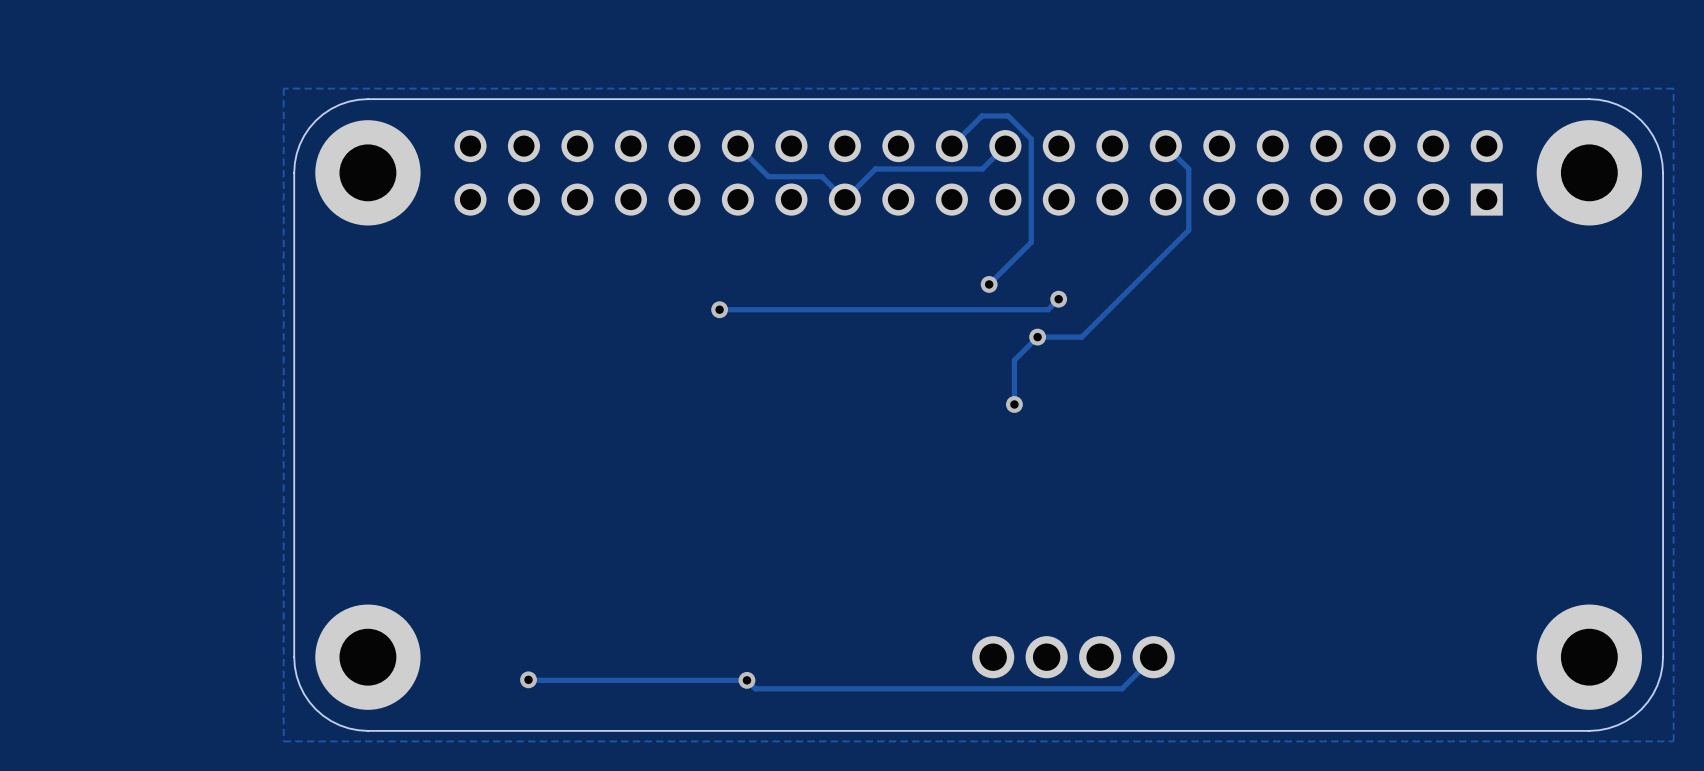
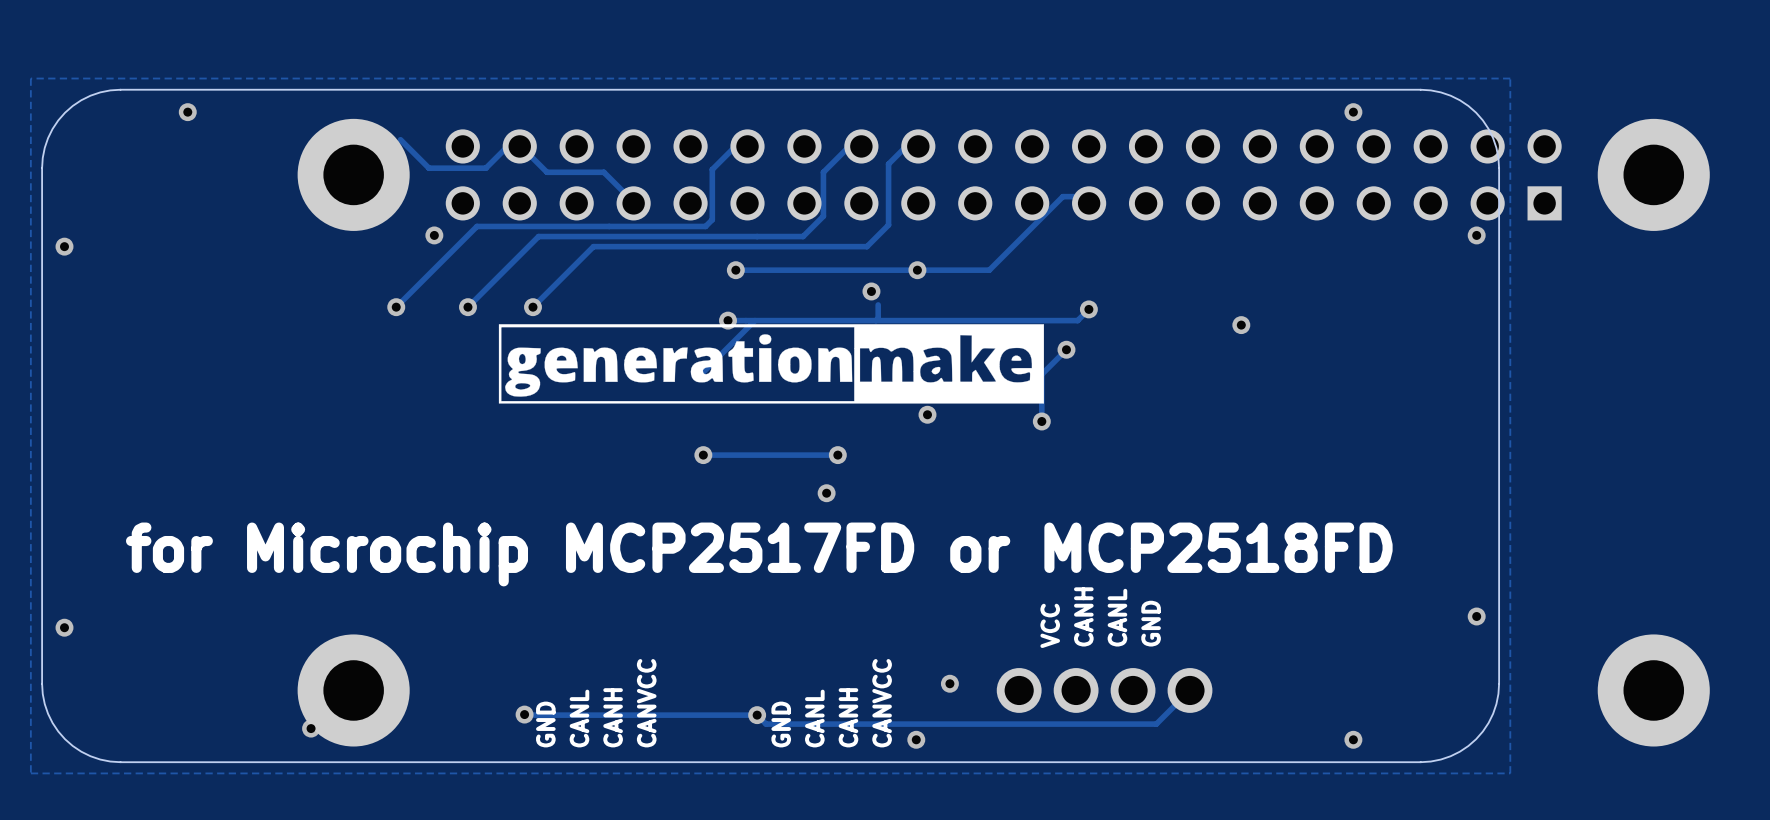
zone outline: (1673, 88) (1673, 741) (283, 741) (283, 88) (1673, 88) -> (1510, 78) (1510, 773) (30, 773) (30, 78) (1510, 78)
board edge: (1589, 99) (367, 99) (339, 104) (323, 114) (309, 127) (299, 144) (294, 163) (294, 657) (299, 685) (309, 702) (323, 715) (348, 728) (367, 730) (1589, 730) (1617, 725) (1634, 715) (1647, 702) (1657, 685) (1662, 666) (1663, 172) (1657, 144) (1641, 120) (1617, 104) (1589, 99) -> (1420, 89) (120, 89) (90, 95) (72, 105) (58, 120) (48, 138) (42, 157) (42, 683) (48, 713) (65, 739) (81, 751) (100, 759) (120, 762) (1420, 762) (1450, 756) (1468, 745) (1482, 731) (1493, 713) (1498, 693) (1499, 168) (1493, 138) (1476, 112) (1450, 95) (1420, 89)
via: none -> (187, 112)
via: none -> (1353, 112)
track: none -> (400, 139) (428, 168) (485, 168) (514, 139) (546, 172) (603, 172) (628, 196)
track: none -> (742, 139) (712, 169) (712, 219) (705, 226) (476, 226) (396, 307)
track: none -> (855, 139) (823, 172) (823, 216) (803, 236) (538, 236) (467, 307)
track: none -> (912, 139) (888, 164) (888, 225) (866, 246) (593, 246) (532, 307)
track: (951, 146) (982, 115) (1008, 115) (1031, 139) (1031, 242) (989, 284) -> none
track: (1005, 146) (982, 168) (875, 168) (844, 199) (822, 176) (768, 176) (737, 146) -> none
track: (1165, 146) (1188, 168) (1188, 230) (1081, 337) (1037, 337) -> none
track: none -> (1083, 196) (1062, 196) (989, 270) (735, 270)
via: none -> (434, 235)
via: none -> (1476, 235)
via: none -> (64, 246)
via: none -> (735, 270)
via: none -> (917, 270)
via: none -> (871, 291)
via: (989, 284) -> none
track: none -> (878, 304) (878, 318) (875, 320)
via: none -> (396, 307)
via: none -> (467, 307)
via: none -> (532, 307)
track: none -> (754, 320) (703, 372)
drawing: none -> [498, 324, 1044, 404]
via: none -> (1241, 325)
via: none -> (927, 414)
via: none -> (703, 455)
track: none -> (837, 455) (703, 455)
via: none -> (837, 455)
via: none -> (826, 493)
text: none -> for Microchip MCP2517FD or MCP2518FD (759, 554)
via: none -> (1476, 616)
text: none -> CANH (1083, 616)
text: none -> CANL (1117, 617)
text: none -> GND (1151, 623)
text: none -> VCC (1050, 625)
via: none -> (64, 627)
via: none -> (949, 683)
text: none -> CANVCC (646, 703)
text: none -> CANVCC (882, 703)
text: none -> CANH (613, 717)
text: none -> CANH (848, 717)
text: none -> CANL (579, 718)
text: none -> CANL (814, 718)
text: none -> GND (545, 724)
text: none -> GND (781, 724)
via: none -> (311, 728)
via: none -> (916, 739)
via: none -> (1353, 739)

